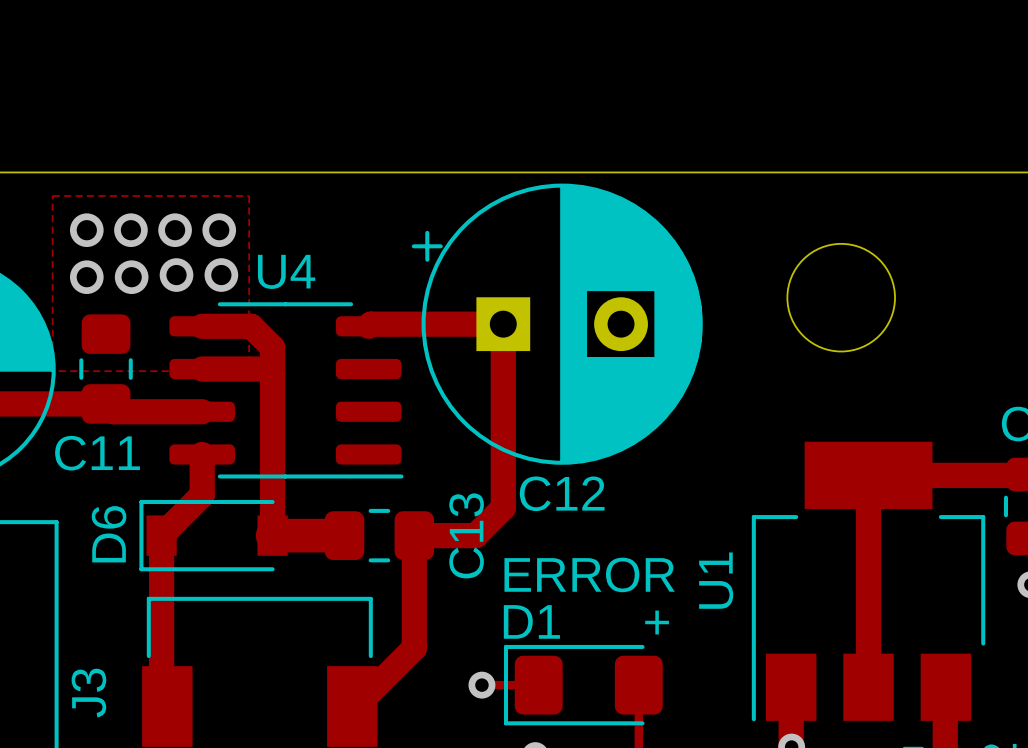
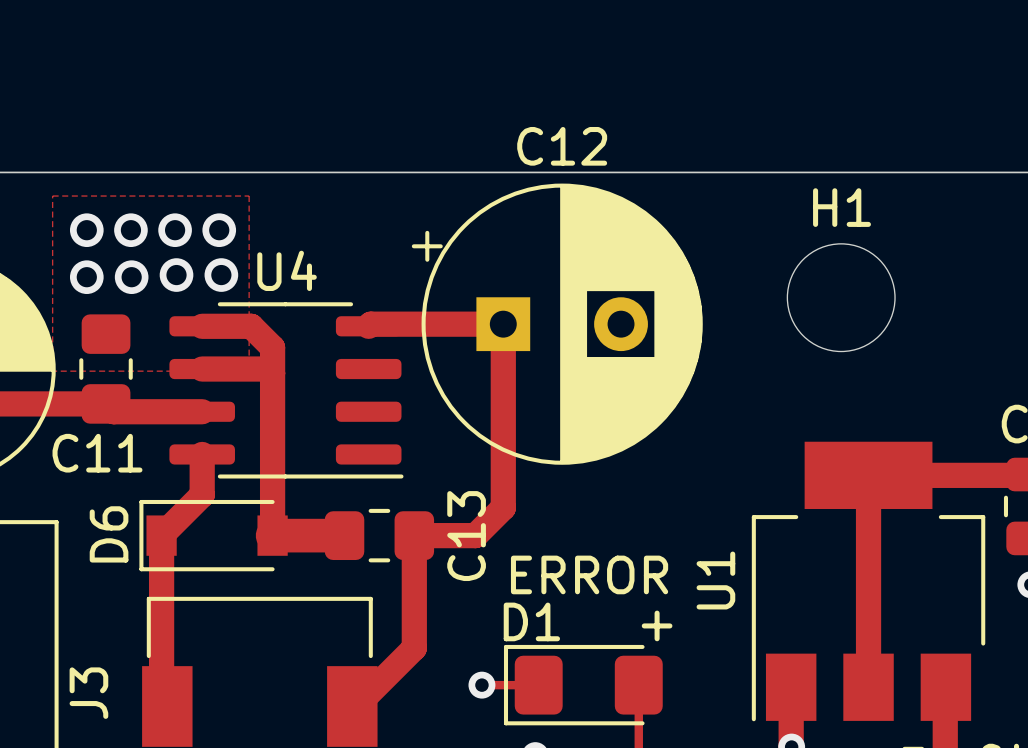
H1 name: none -> H1 (842, 207)
C12 name position: C12 (562, 493) -> C12 (562, 146)

